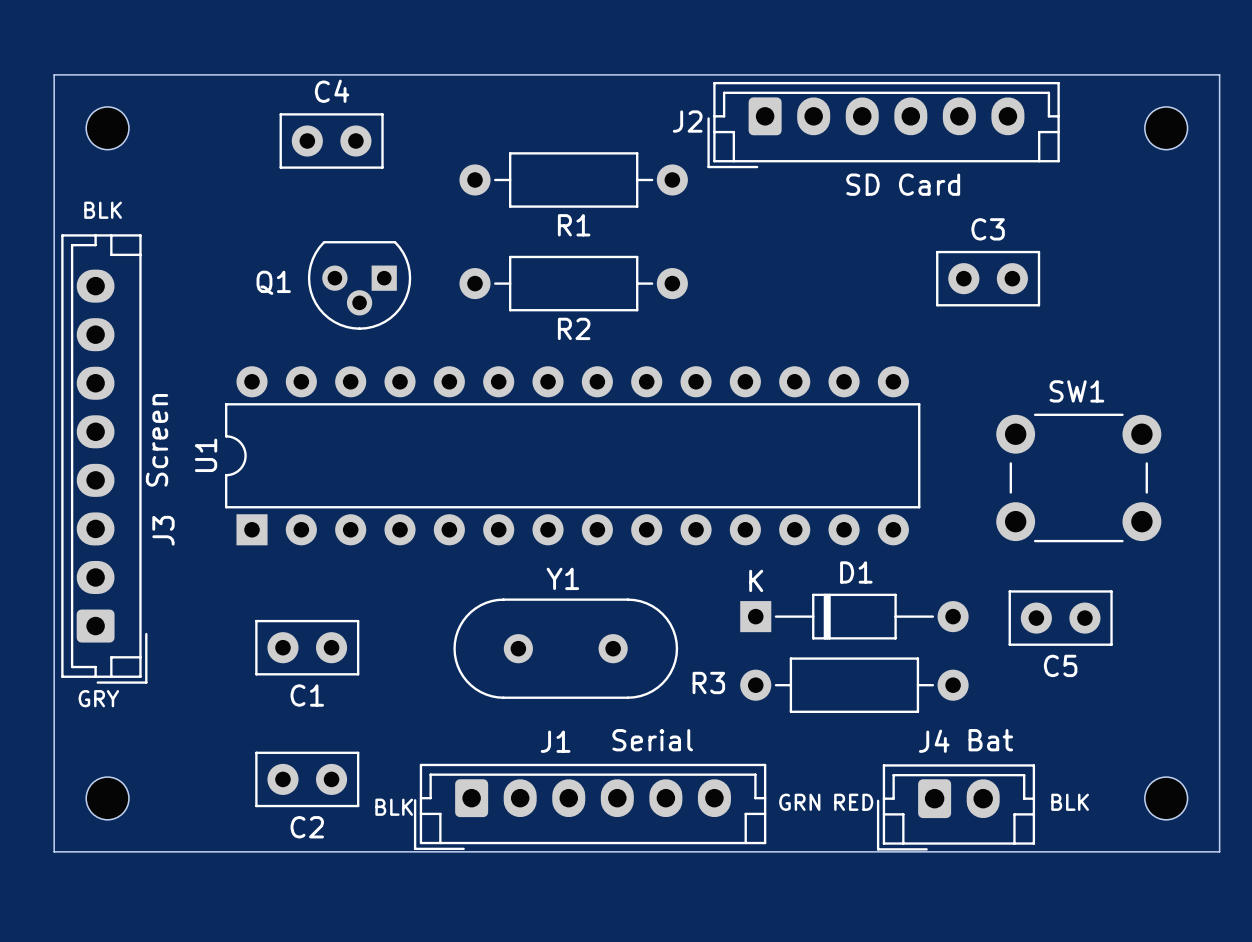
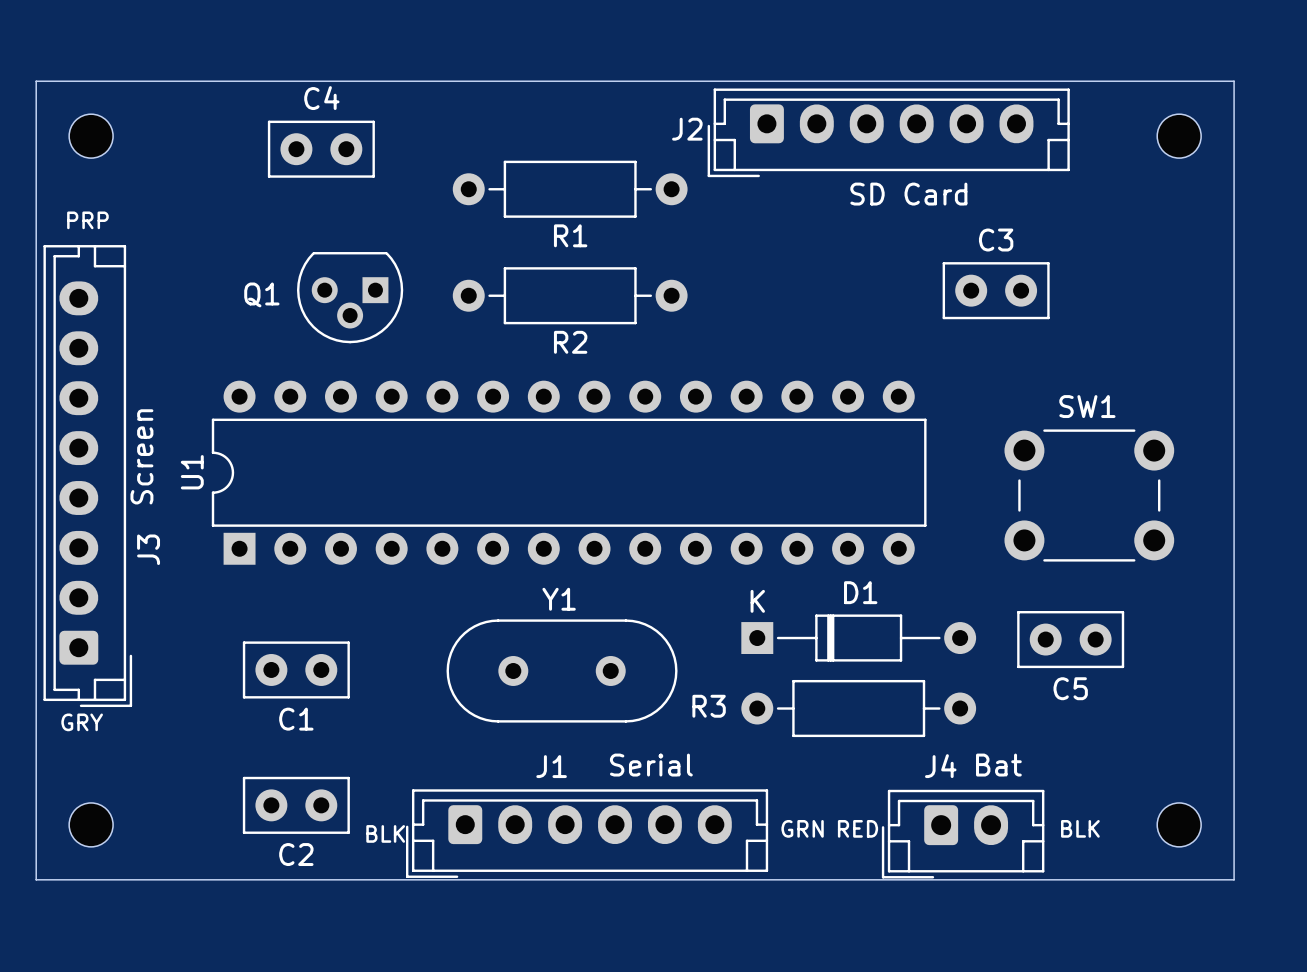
text: BLK (103, 210) -> PRP (87, 220)

